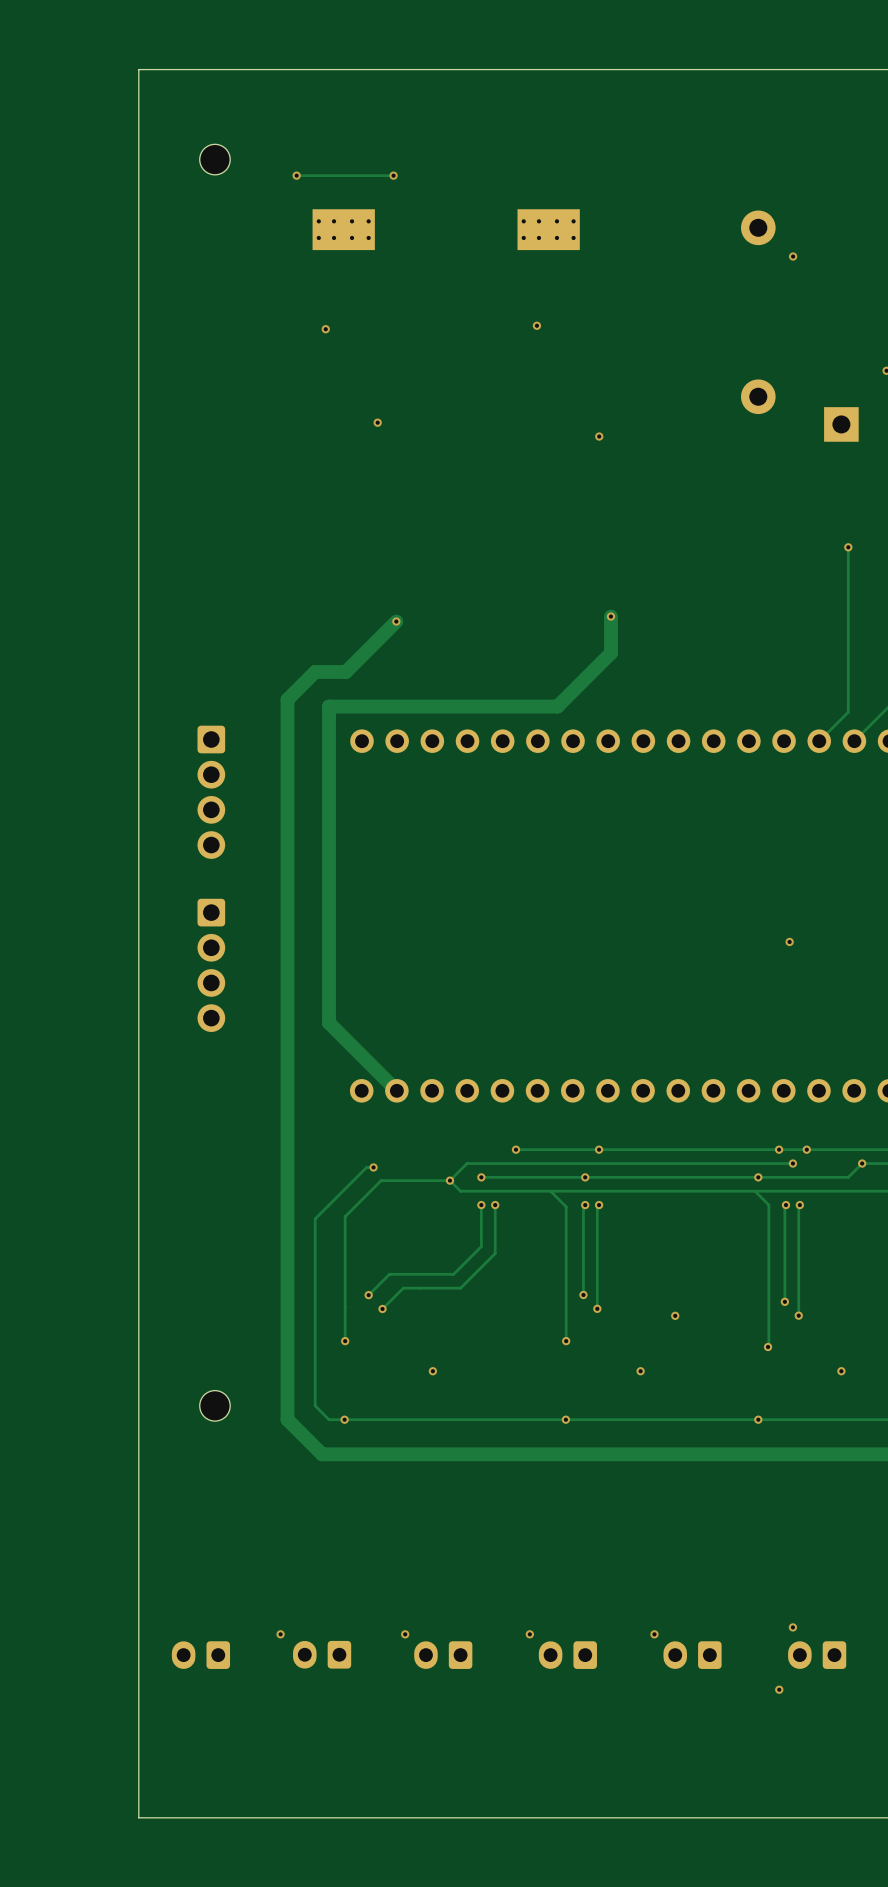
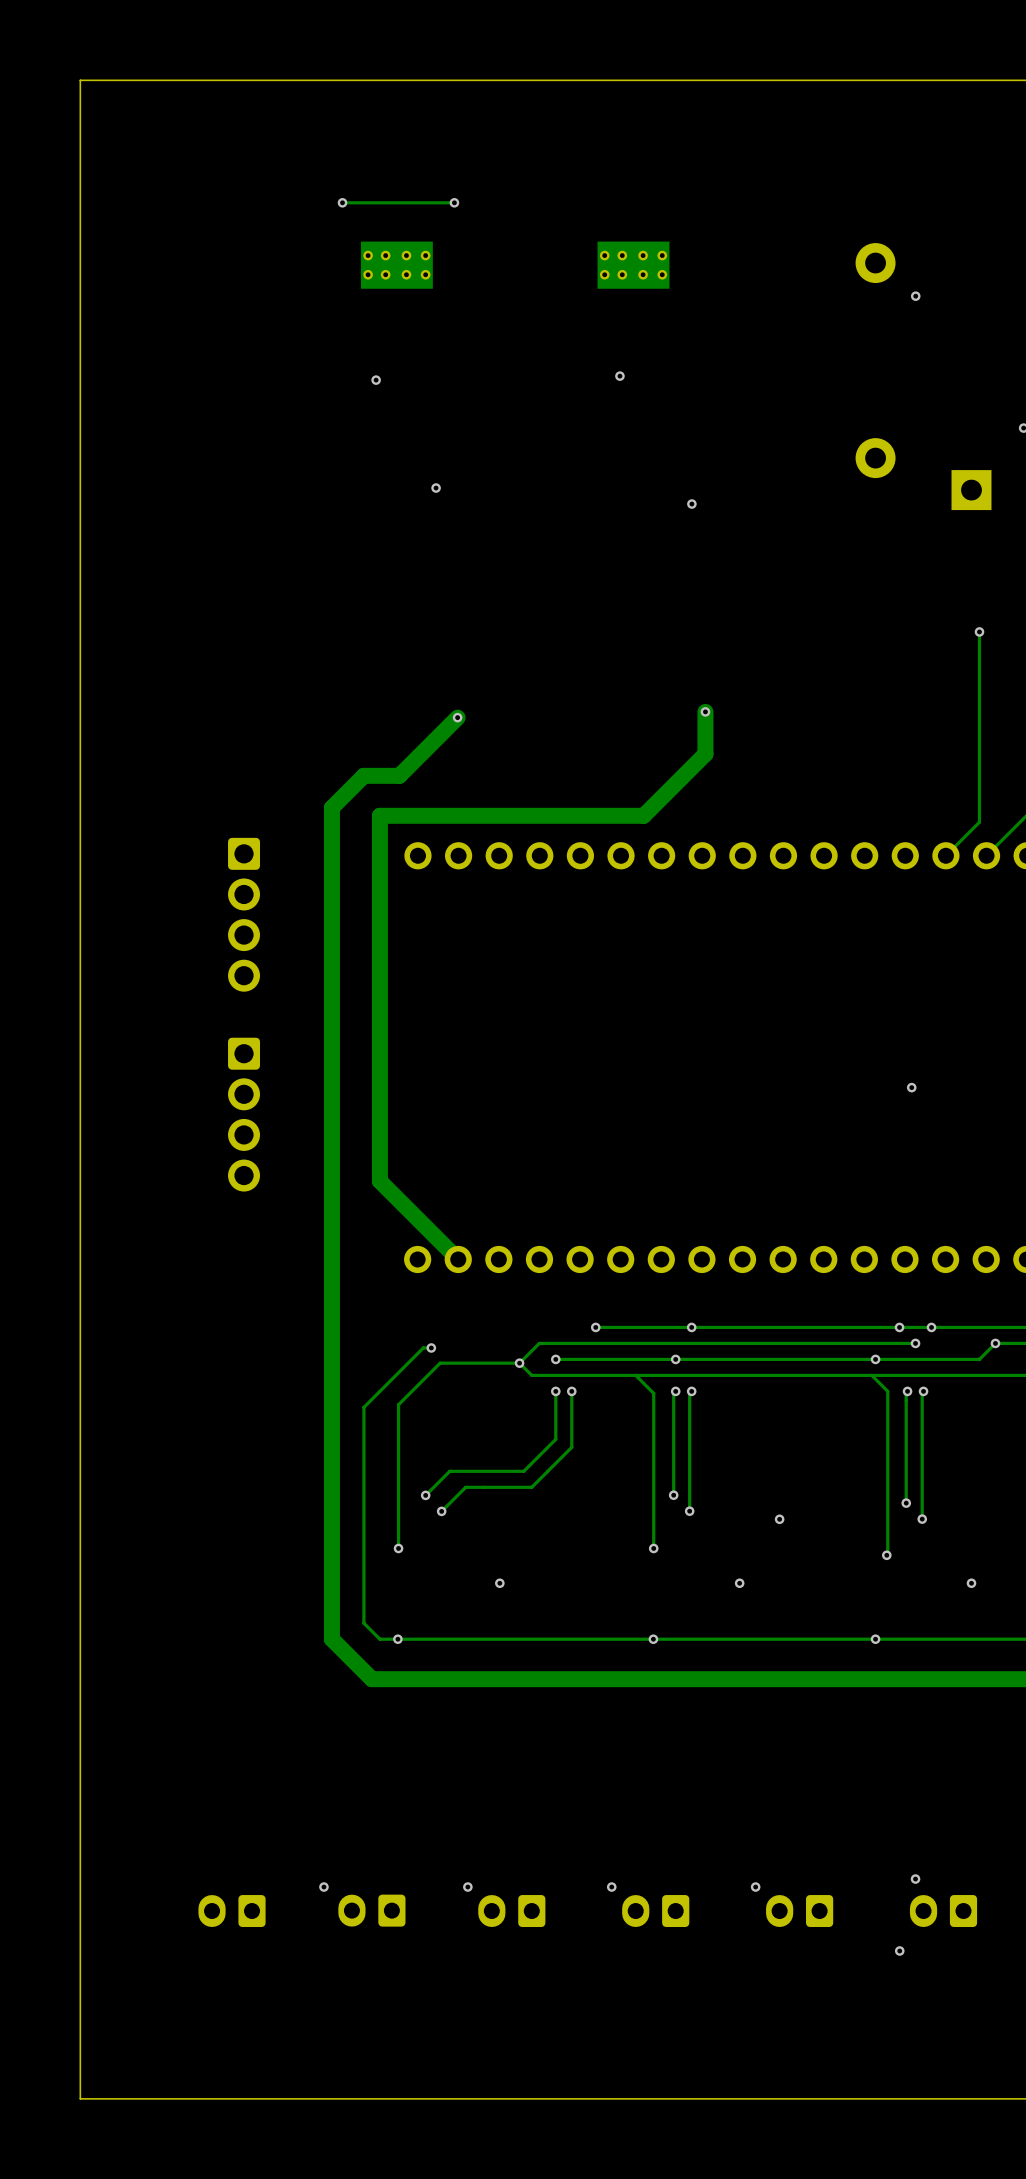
board edge: (138, 69) (138, 1817) -> (160, 80) (80, 80) (80, 2098) (160, 2098)
part: (214, 159) -> none
part: (214, 1405) -> none

